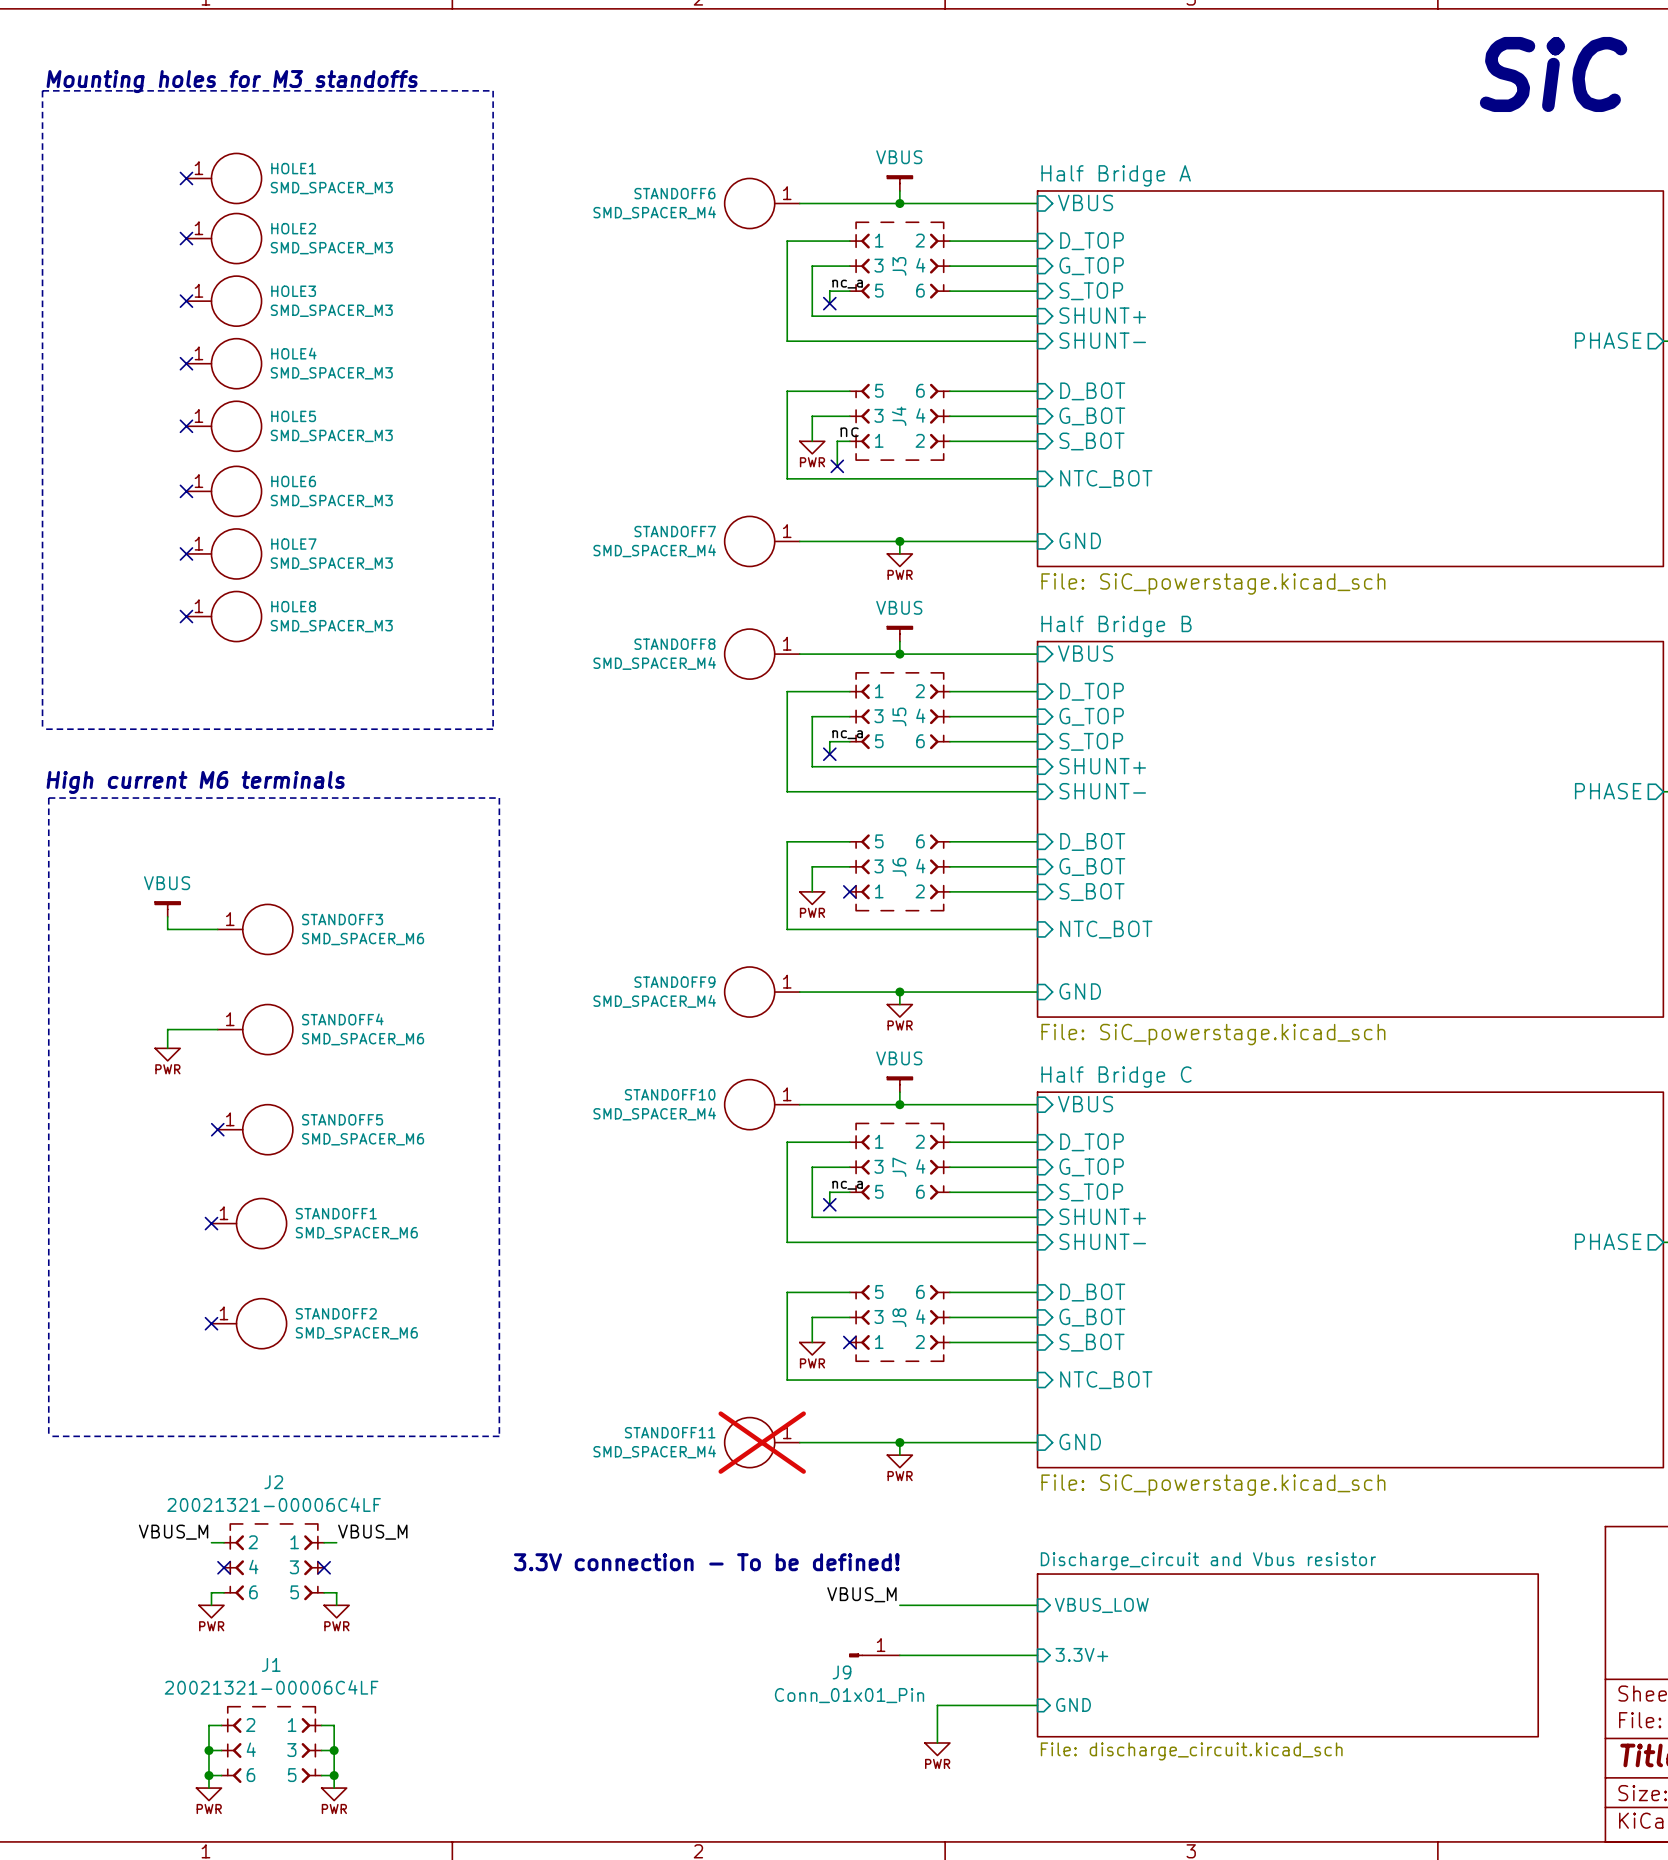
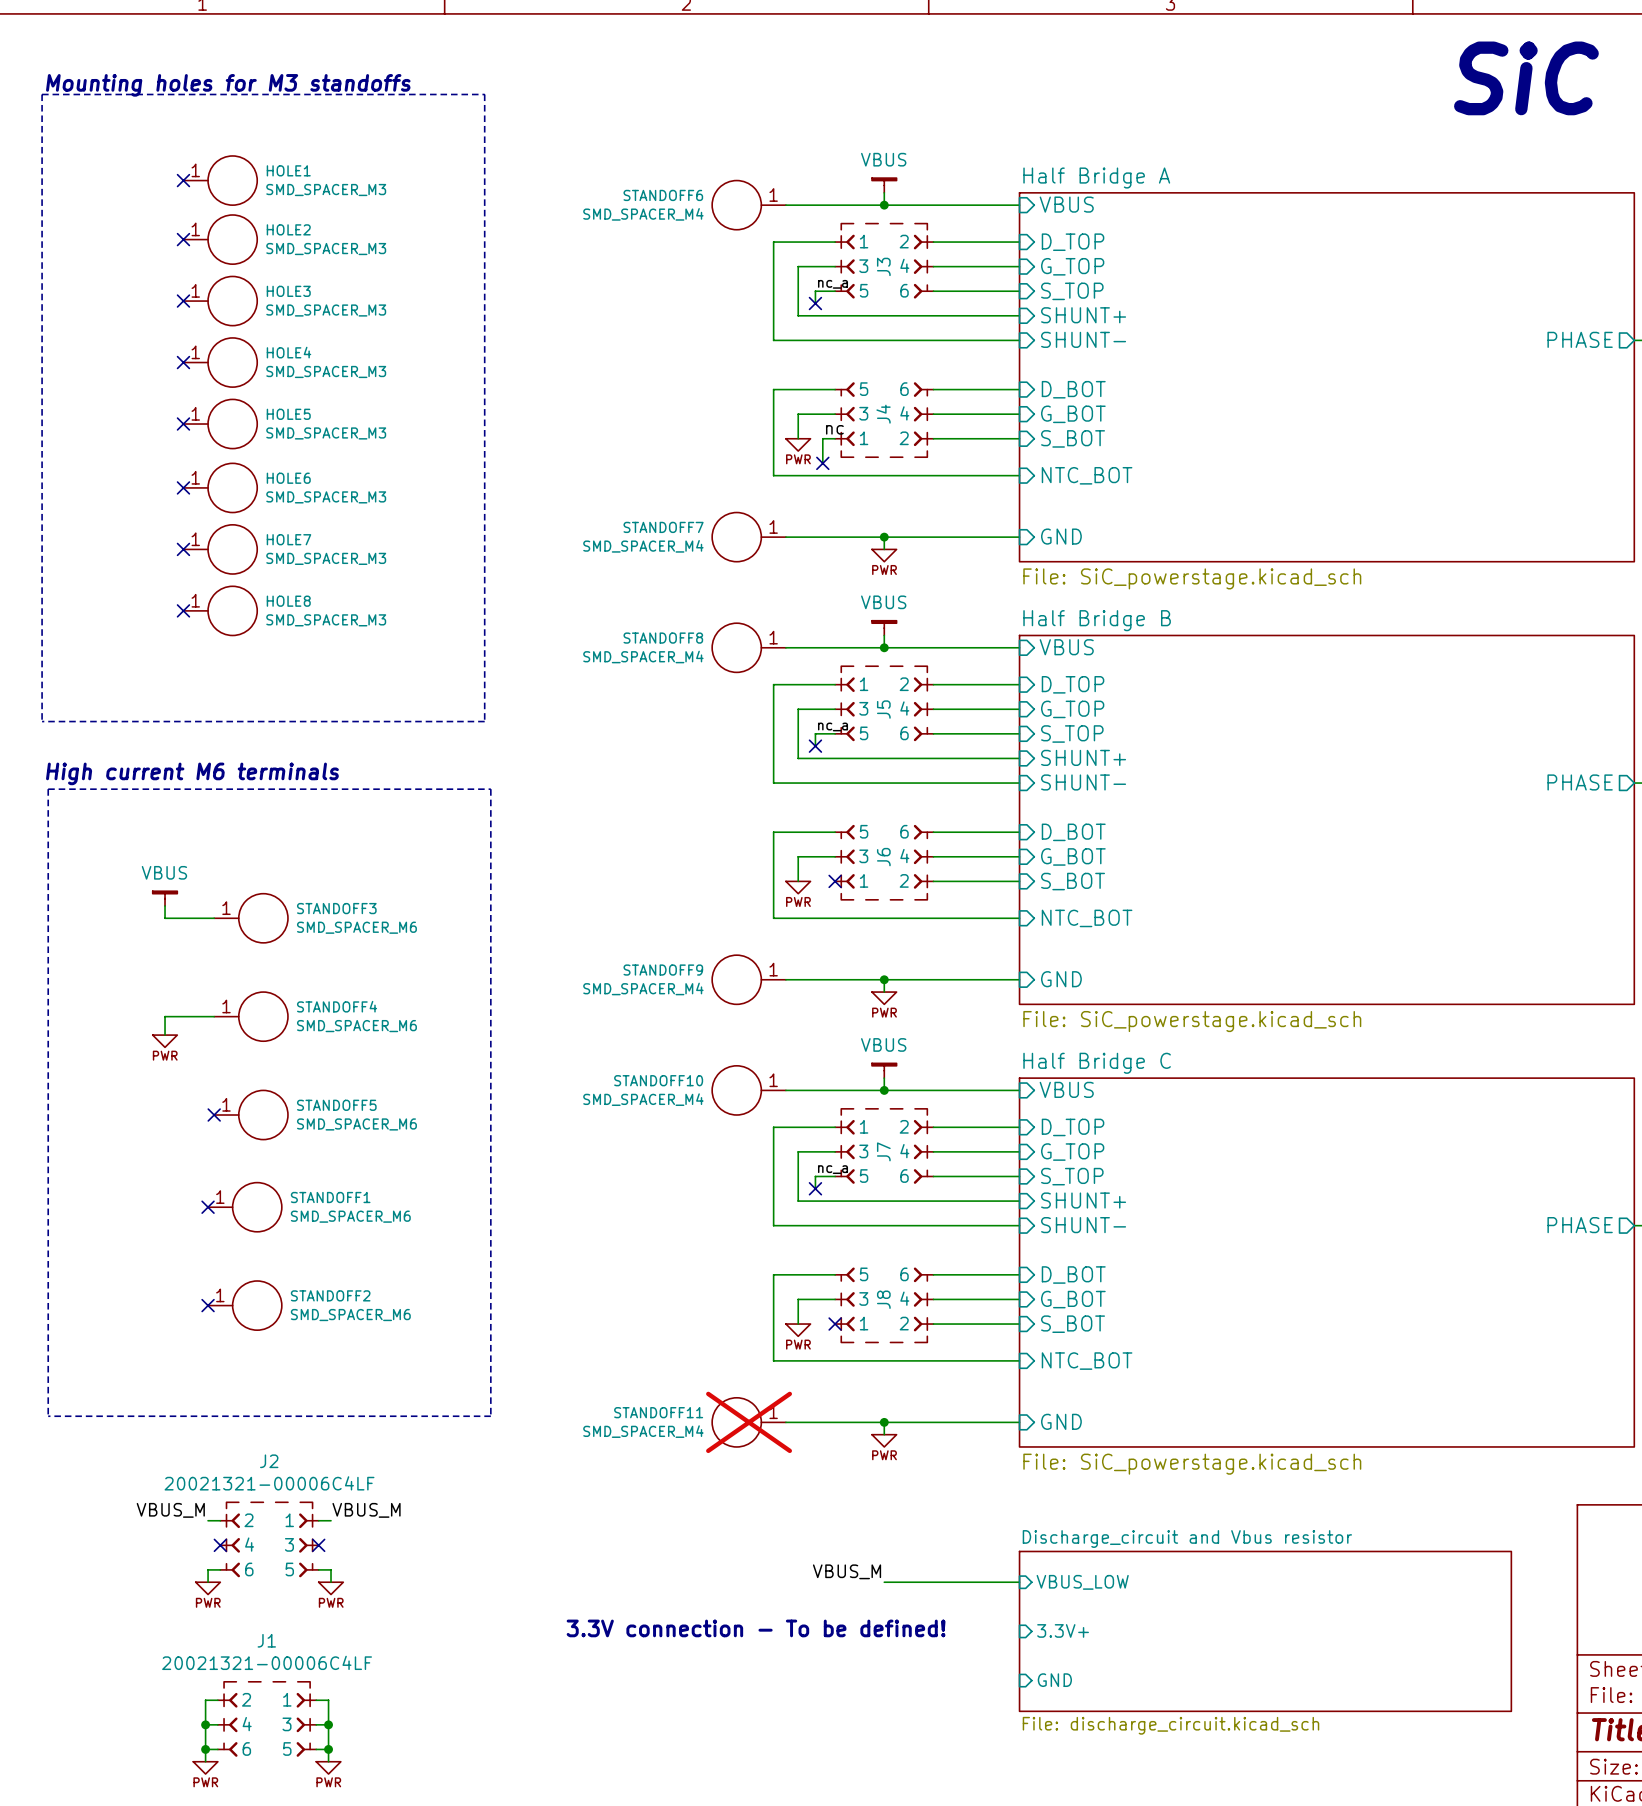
text position: 3.3V connection - To be defined! (706, 1562) -> 3.3V connection - To be defined! (756, 1628)
J9: Conn_01x01_Pin (874, 1655) -> none
wire: (899, 1655) (1037, 1655) -> none
wire: (1037, 1705) (937, 1705) (937, 1742) -> none
power symbol: (937, 1749) -> none

